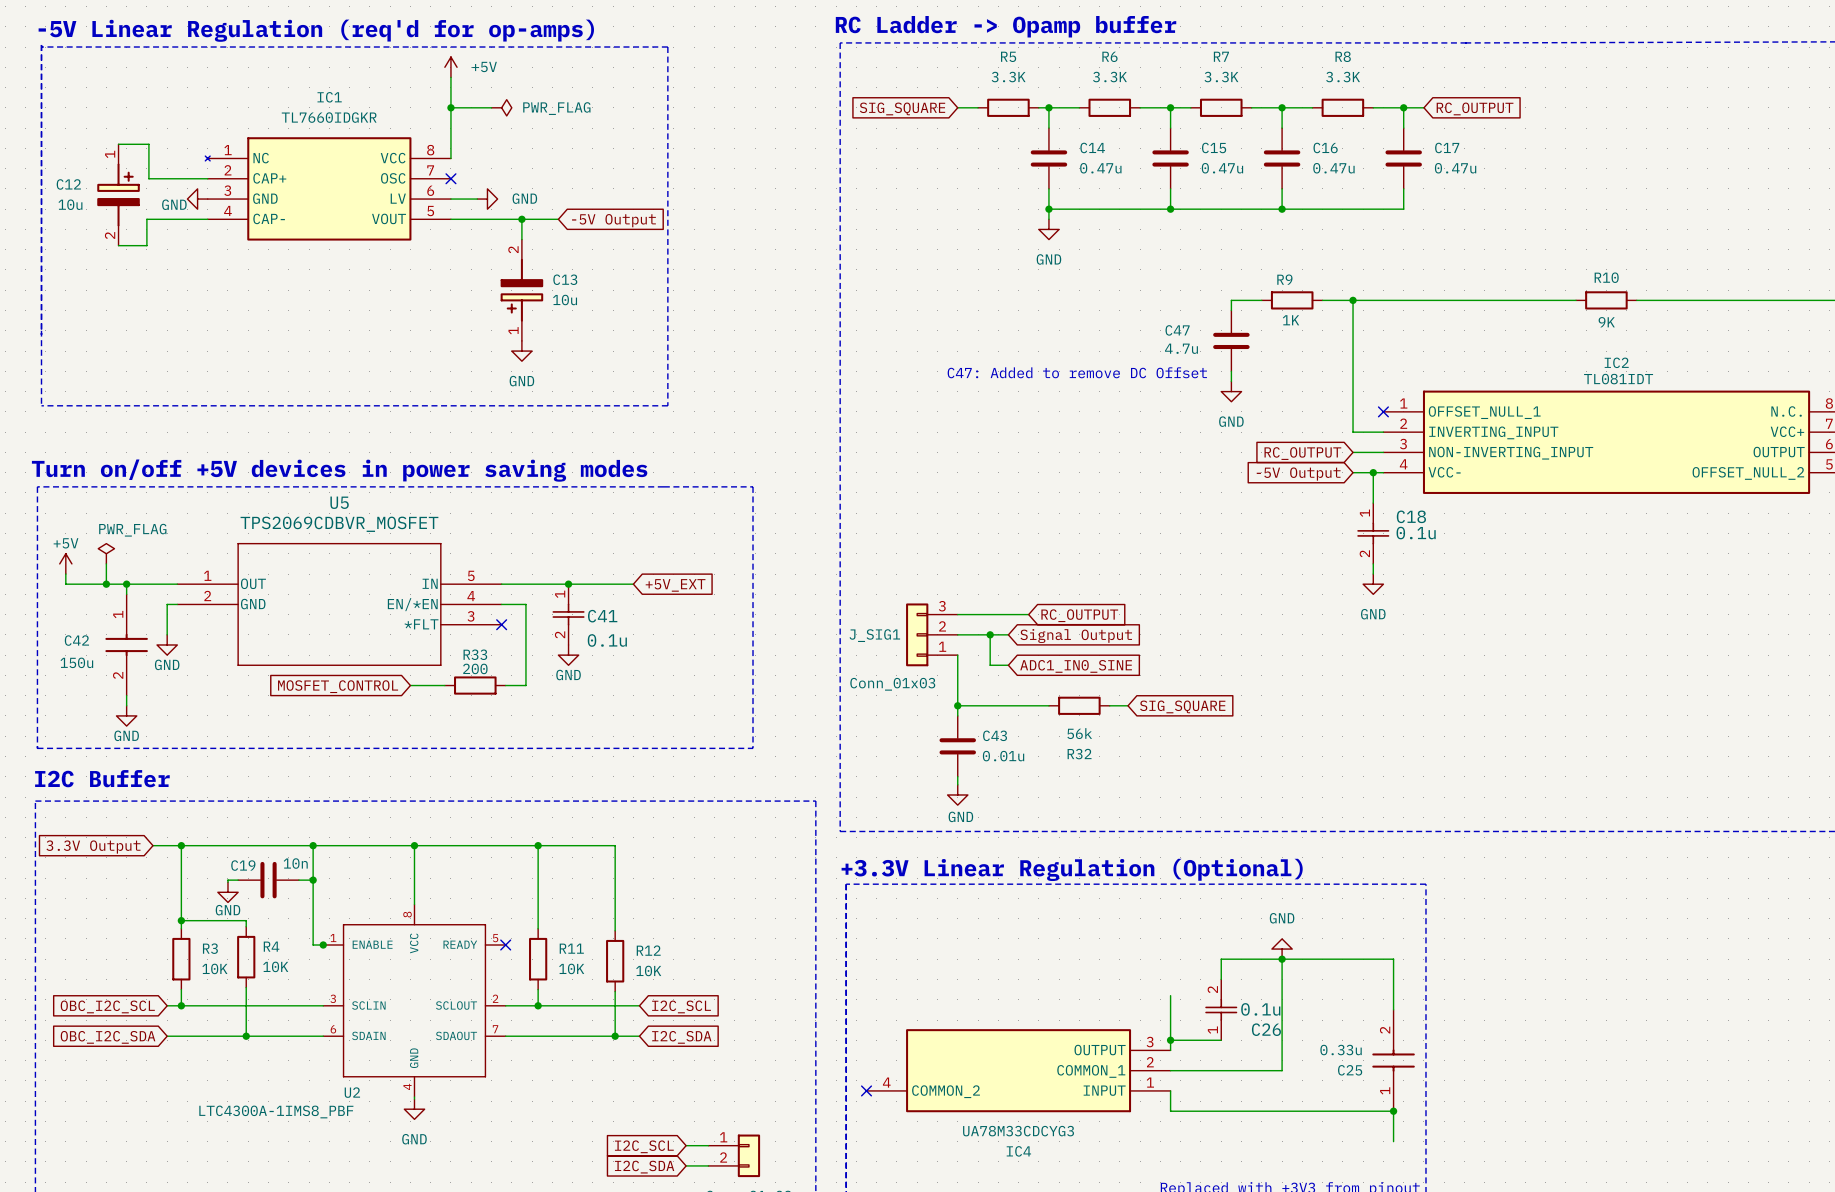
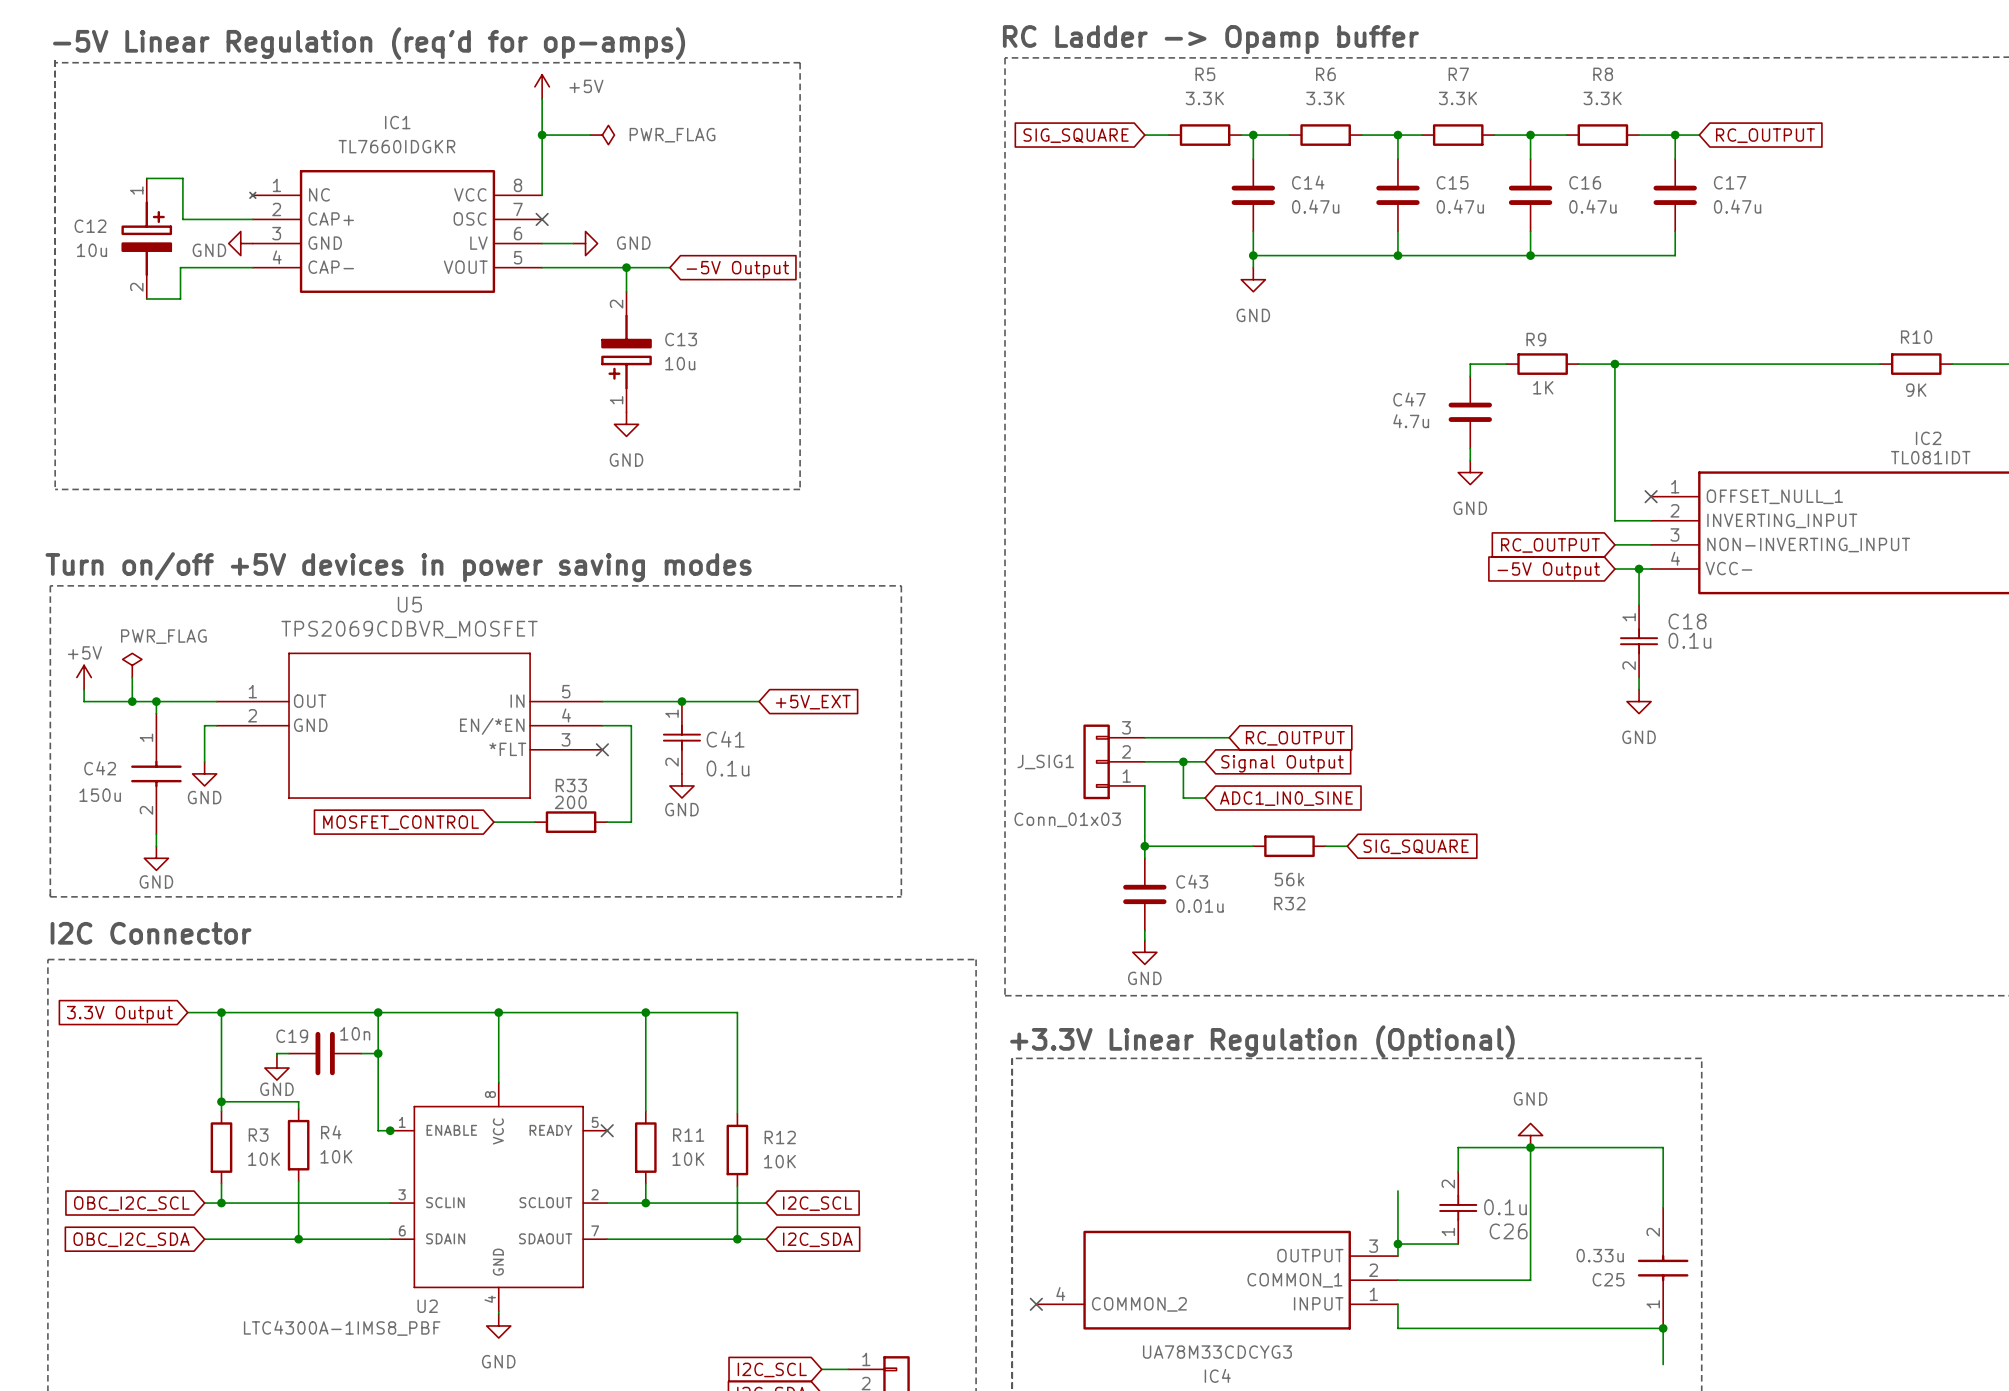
text: C47: Added to remove DC Offset (1077, 372) -> none
text: I2C Buffer (102, 778) -> I2C Connector (151, 933)

